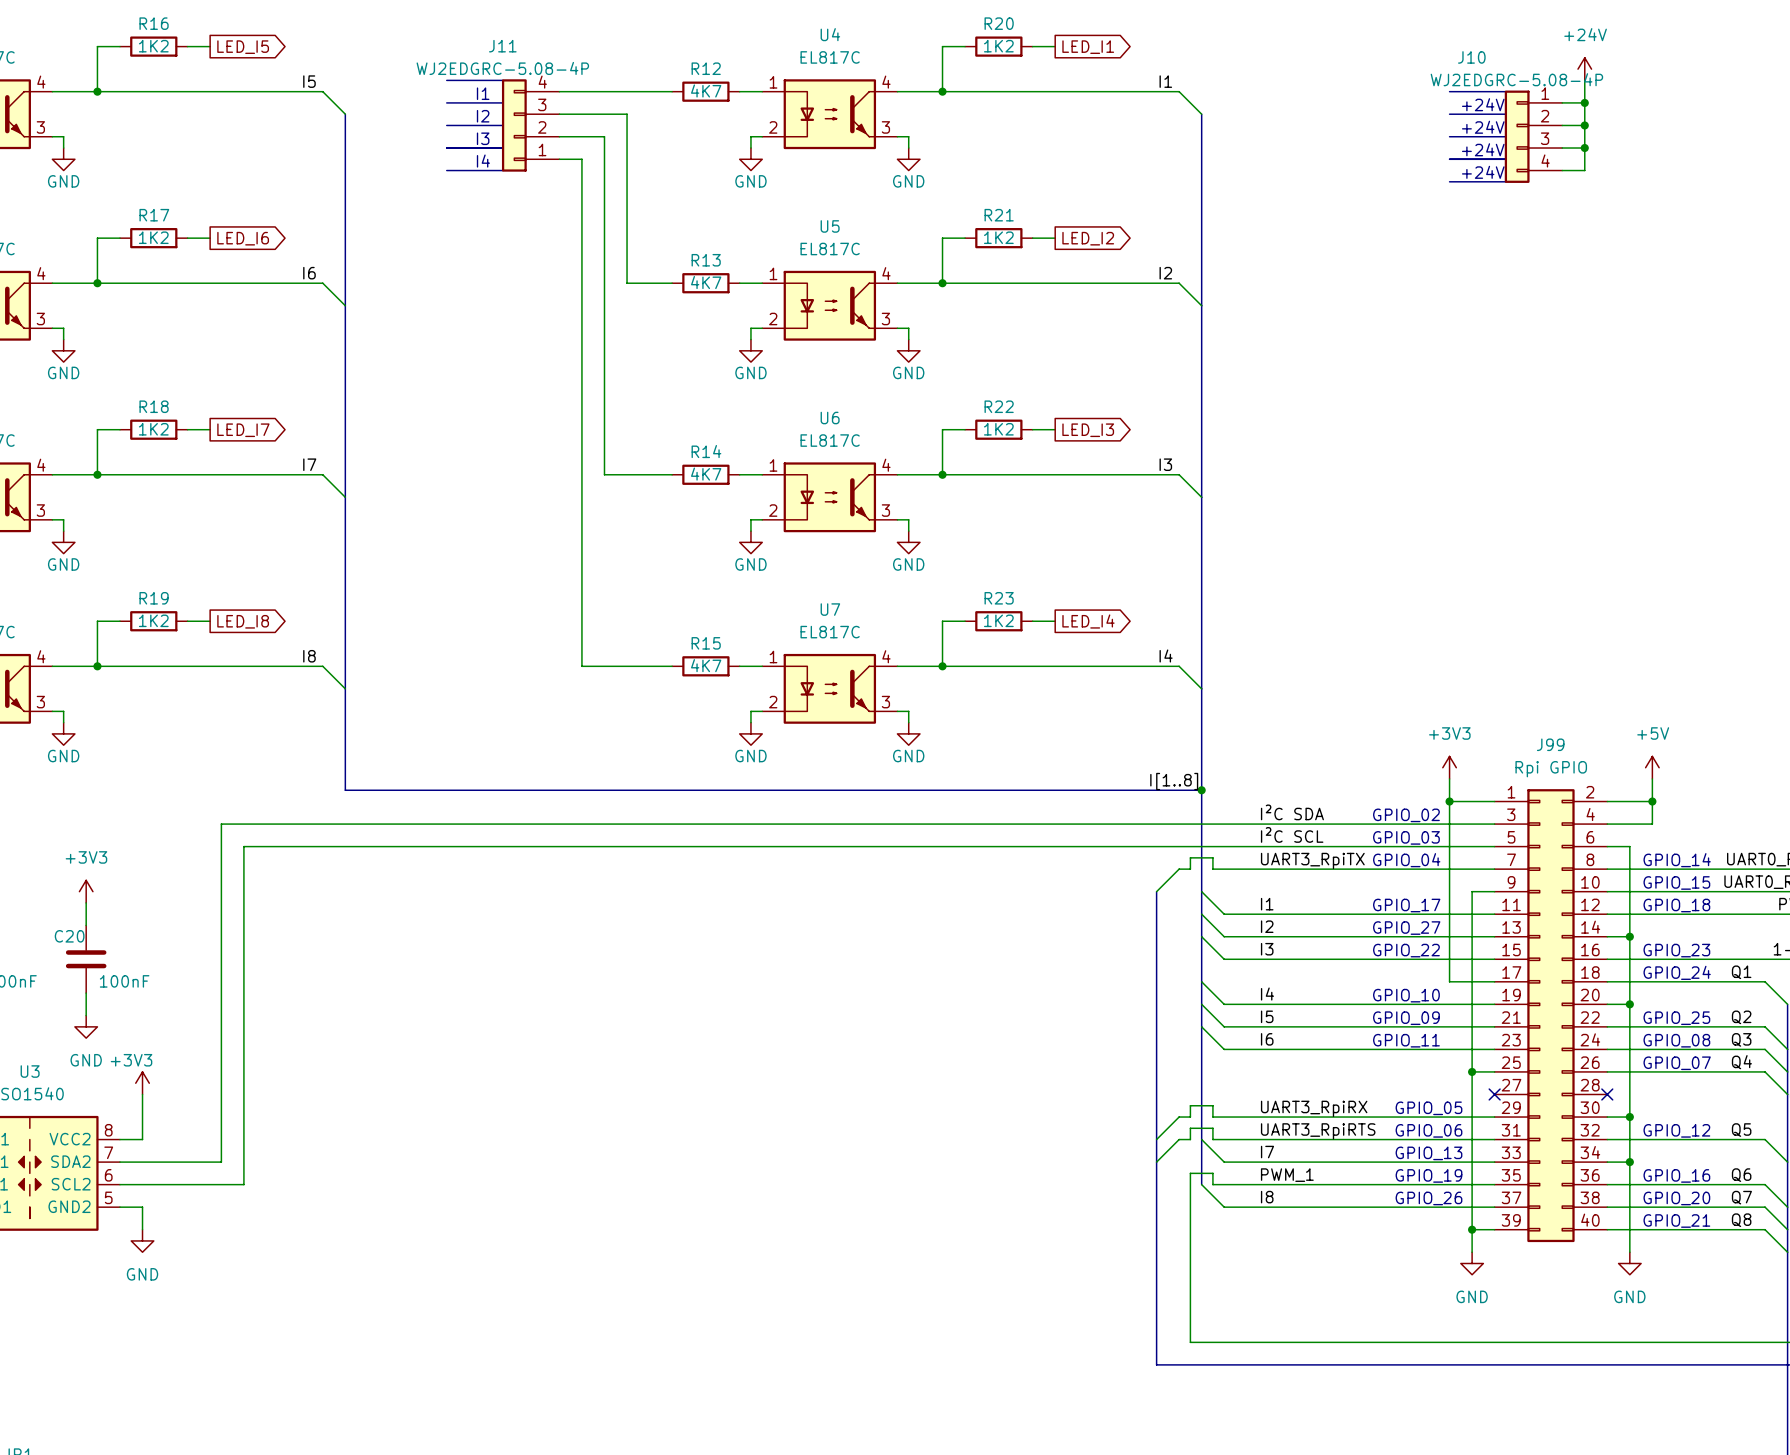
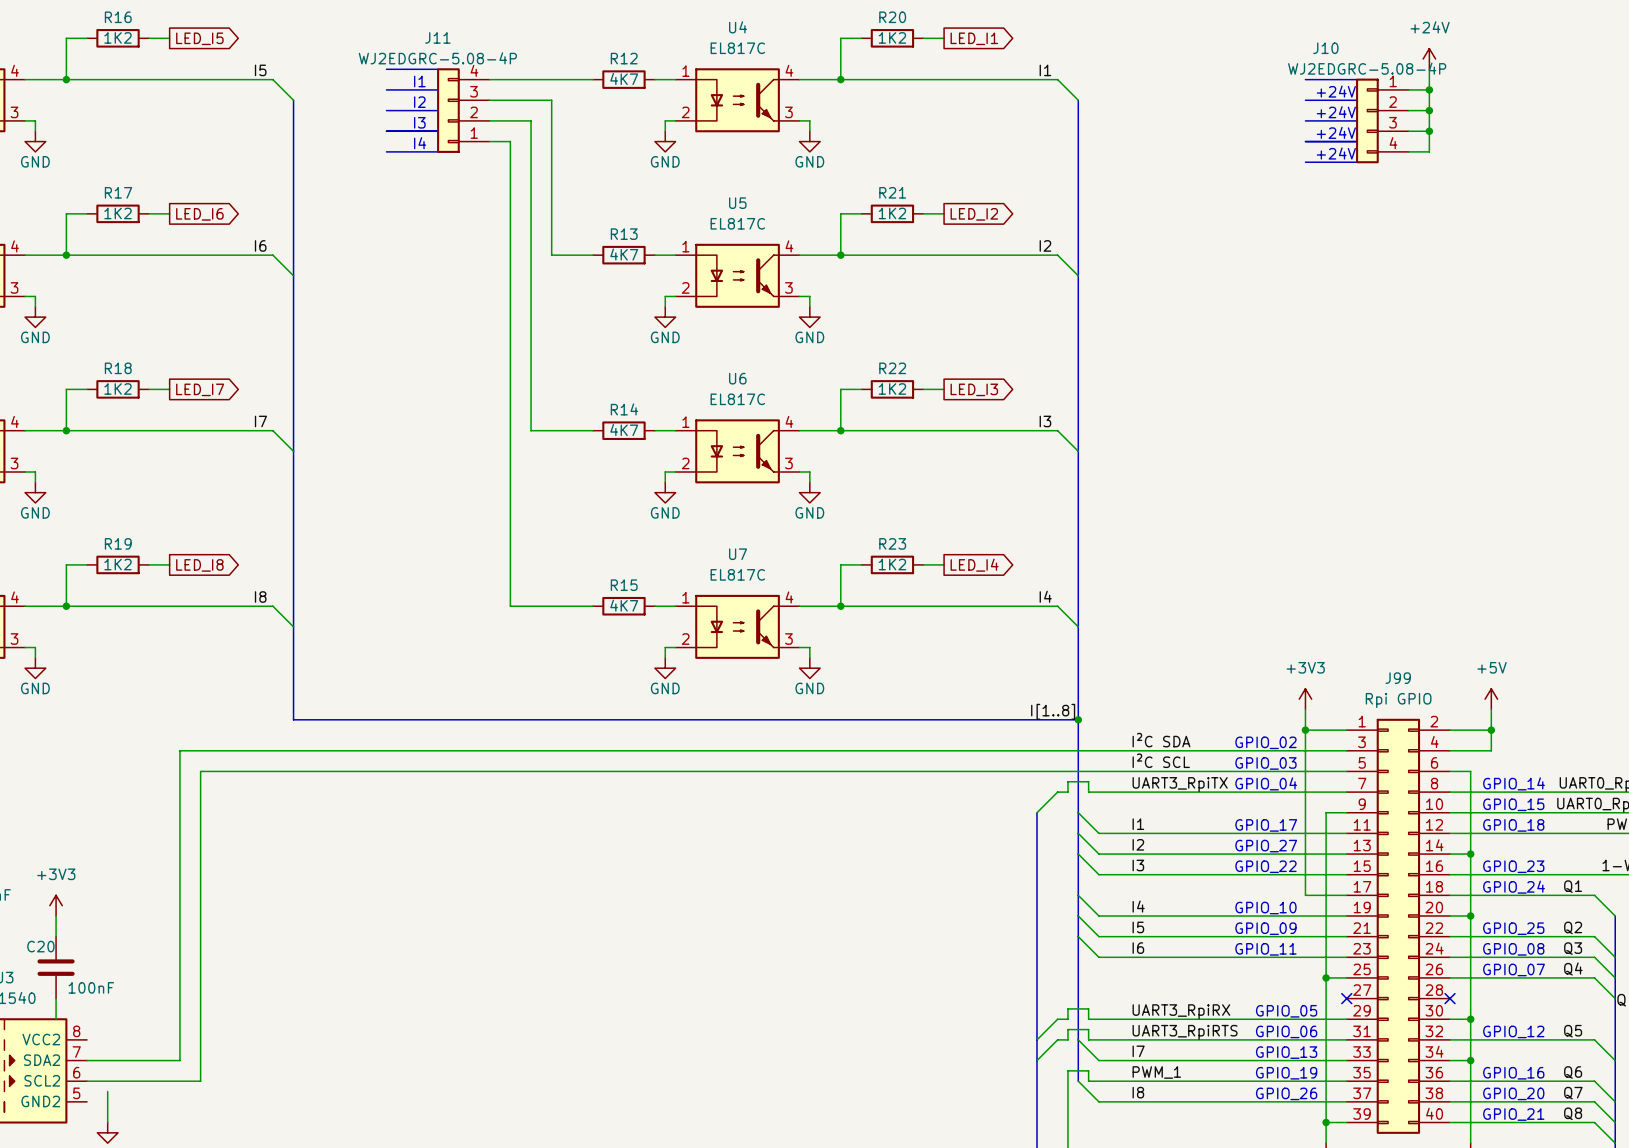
power symbol: +3V3 (86, 891) -> none
wire: (86, 902) (86, 925) -> (56, 998) (56, 1019)
C20 position: (86, 959) -> (56, 967)
power symbol: none -> +3V3 (56, 905)
power symbol: GND (86, 1026) -> none
power symbol: +3V3 (142, 1083) -> none
wire: (142, 1094) (142, 1139) (119, 1139) -> none
wire: (119, 1207) (142, 1207) -> (107, 1091) (107, 1101)

